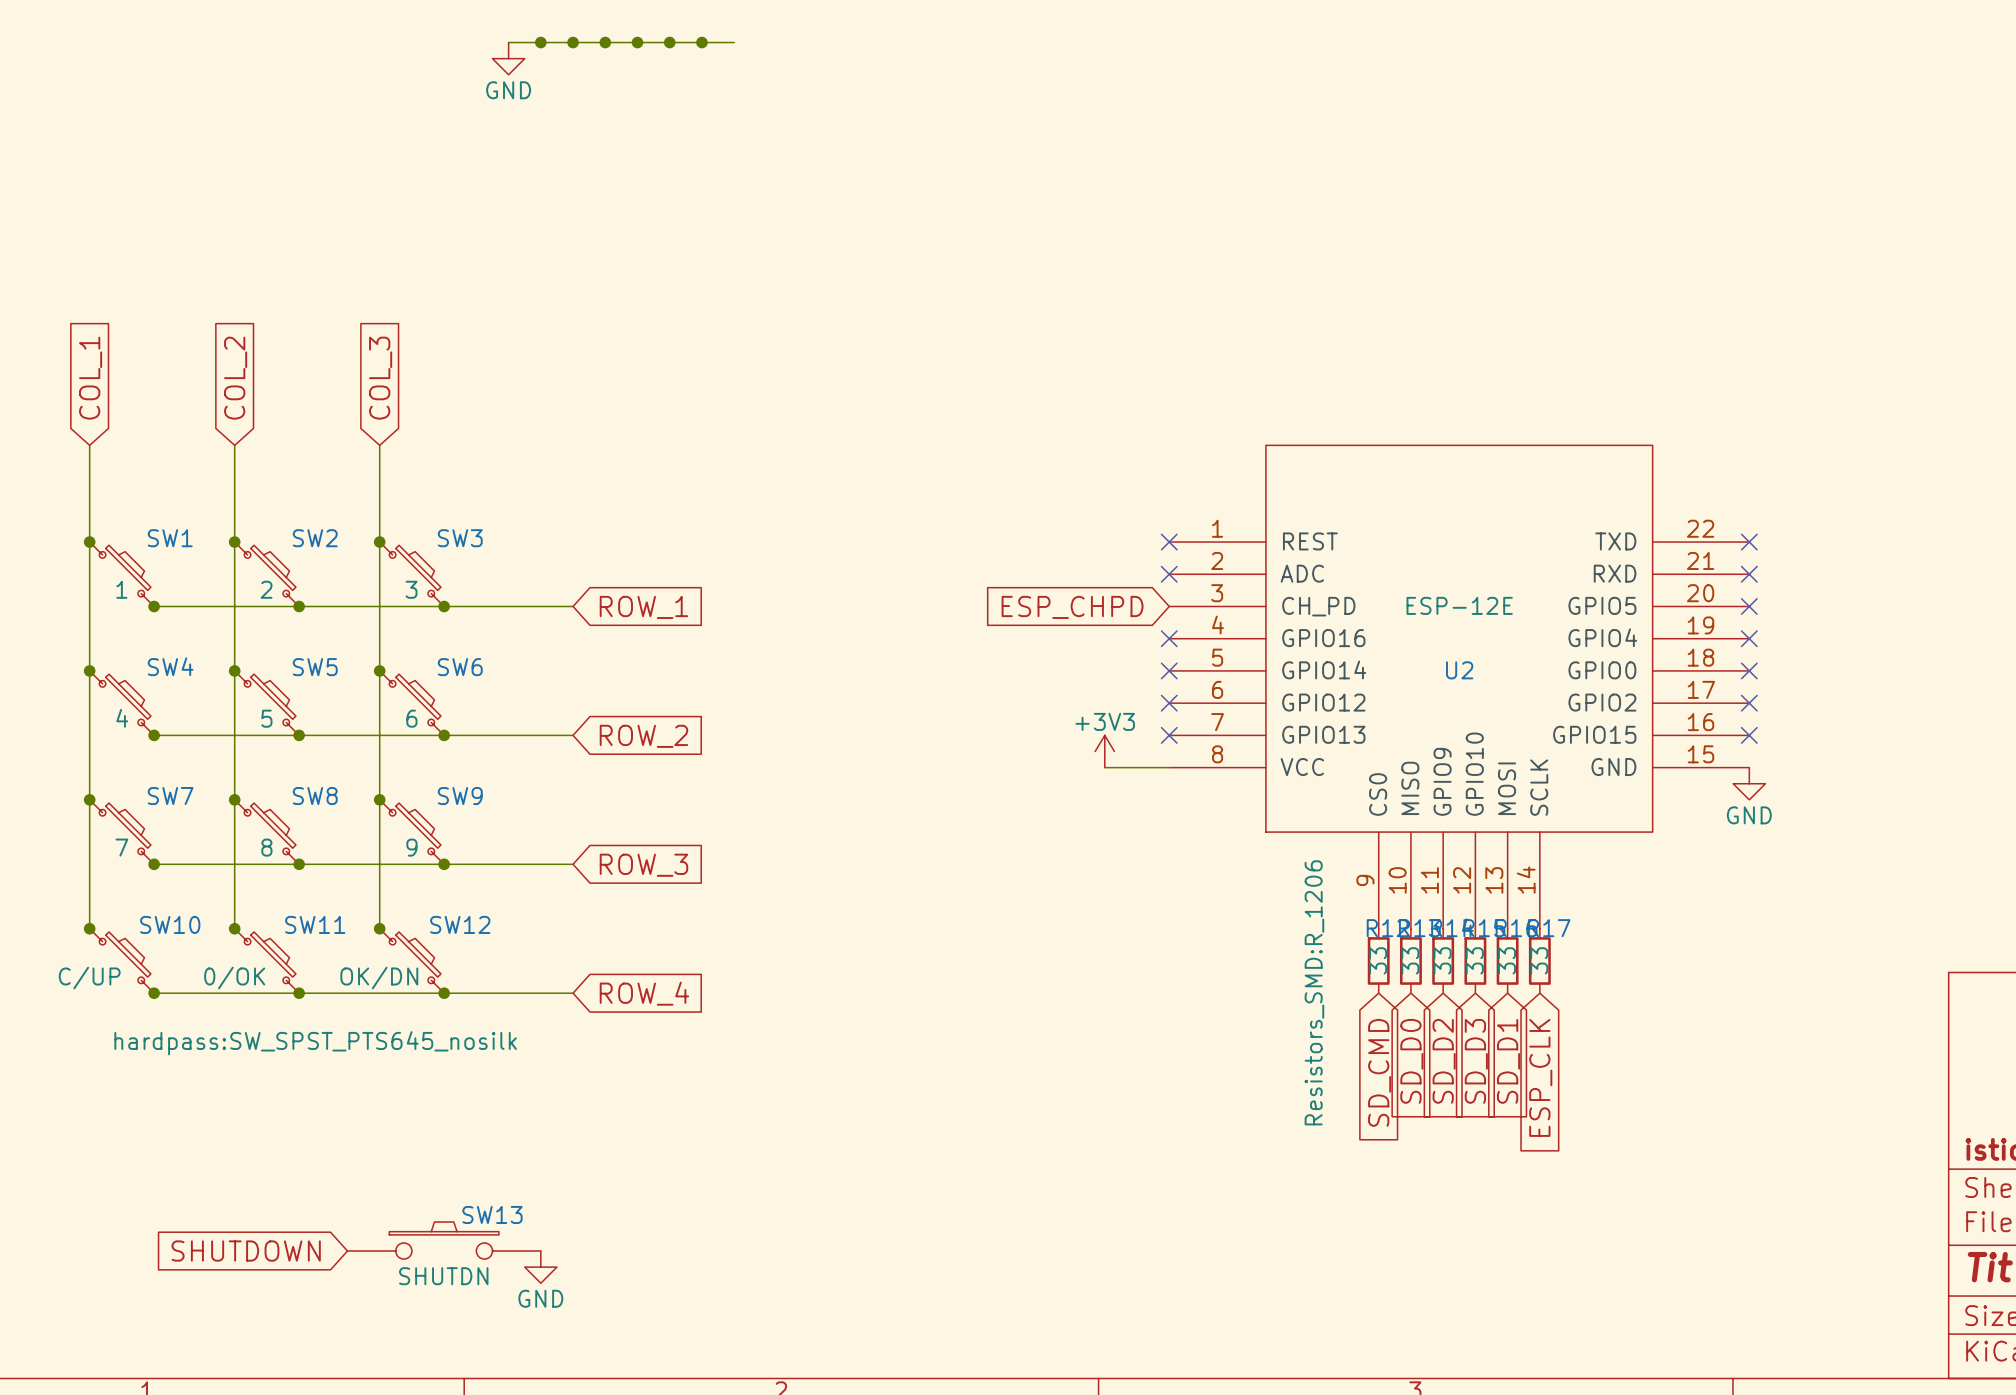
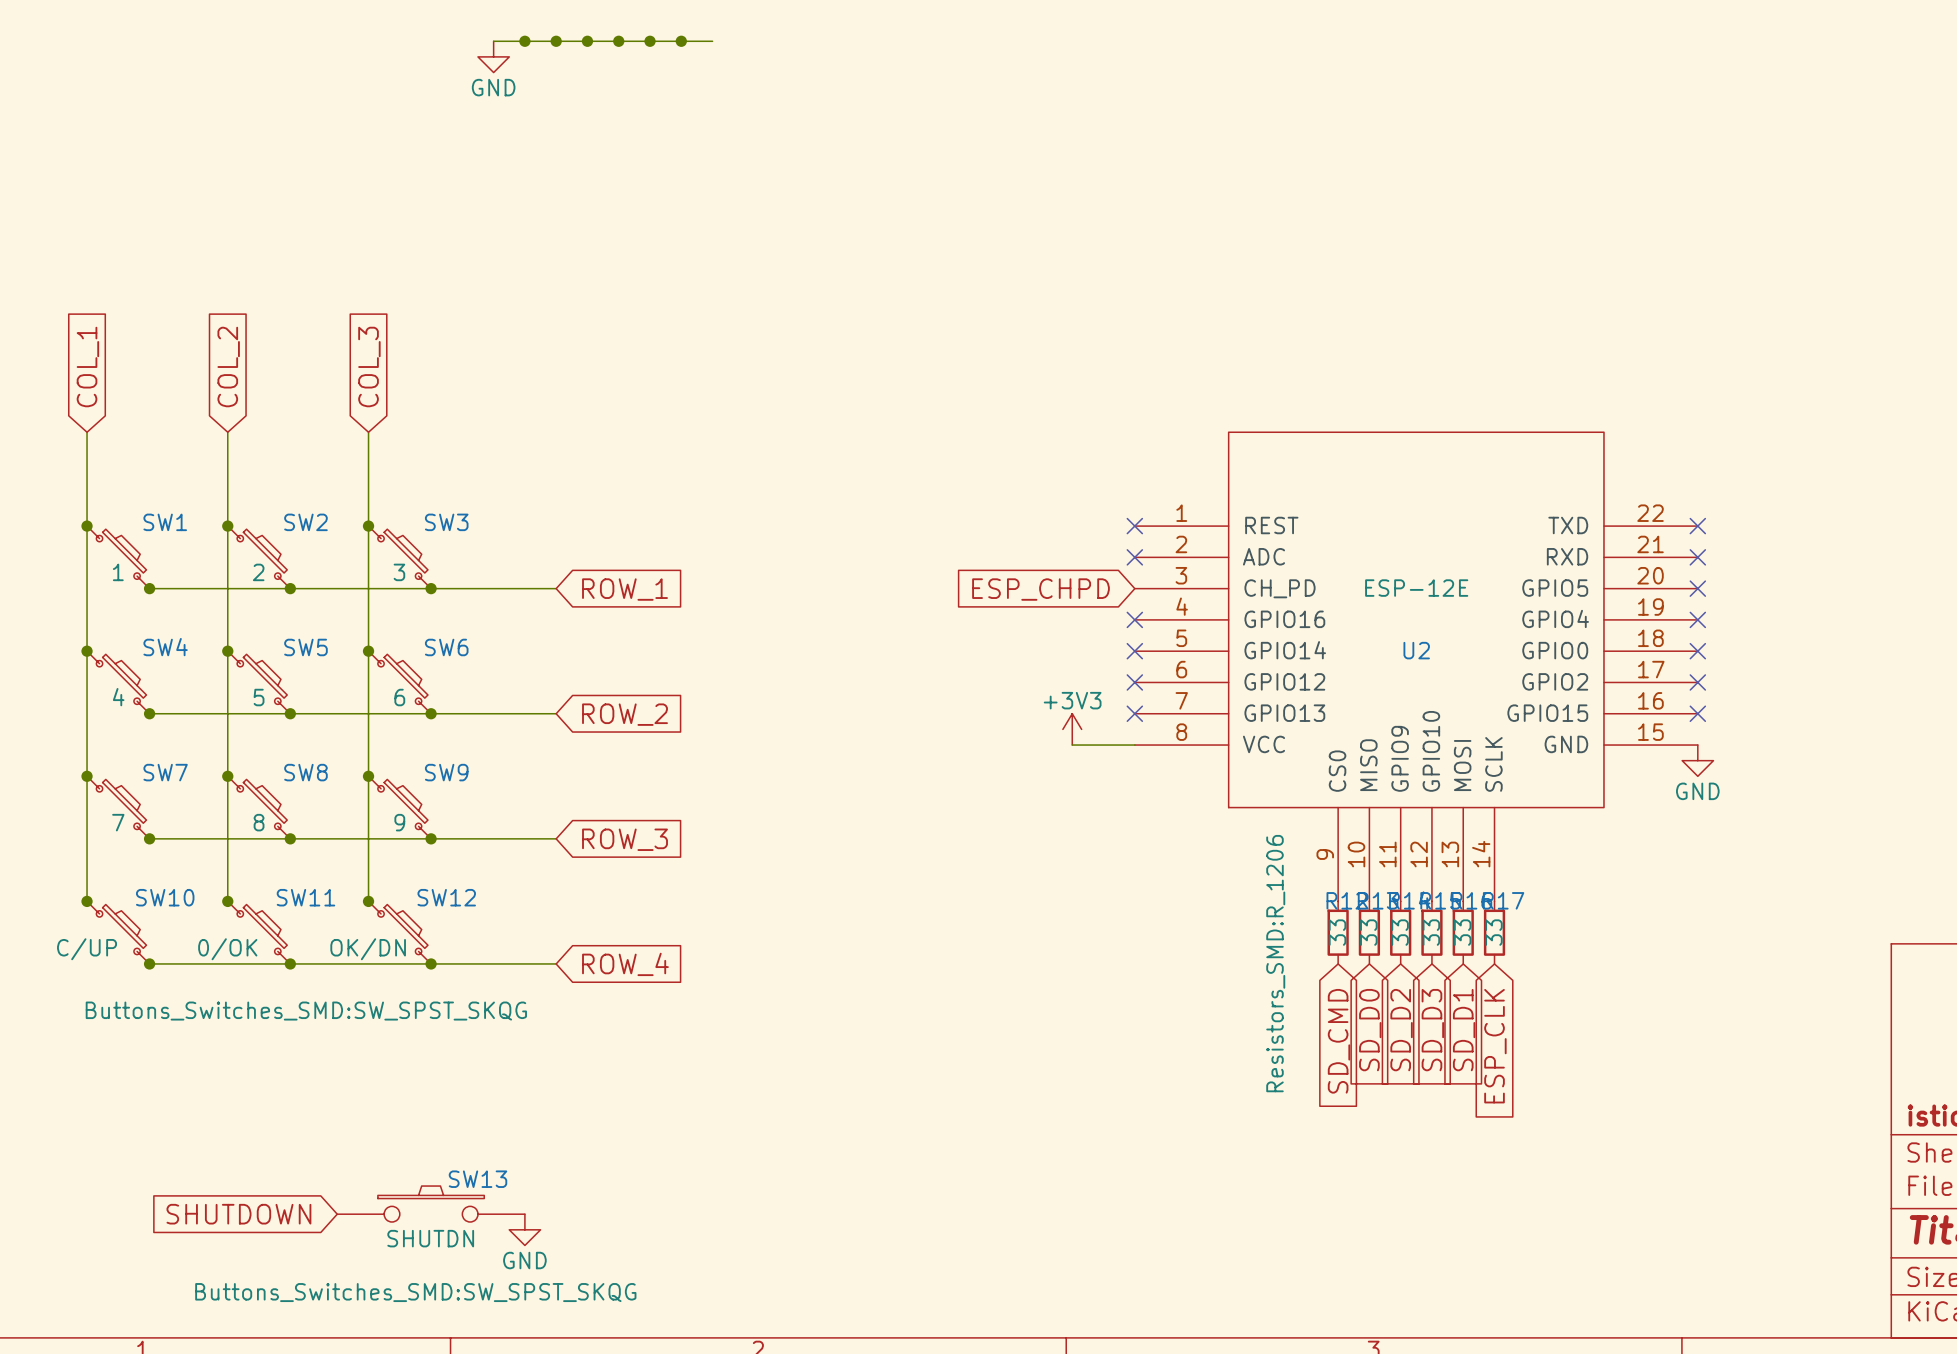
SW1 text: hardpass:SW_SPST_PTS645_nosilk (315, 1043) -> Buttons_Switches_SMD:SW_SPST_SKQG (306, 1011)
SW13 text: none -> Buttons_Switches_SMD:SW_SPST_SKQG (415, 1292)

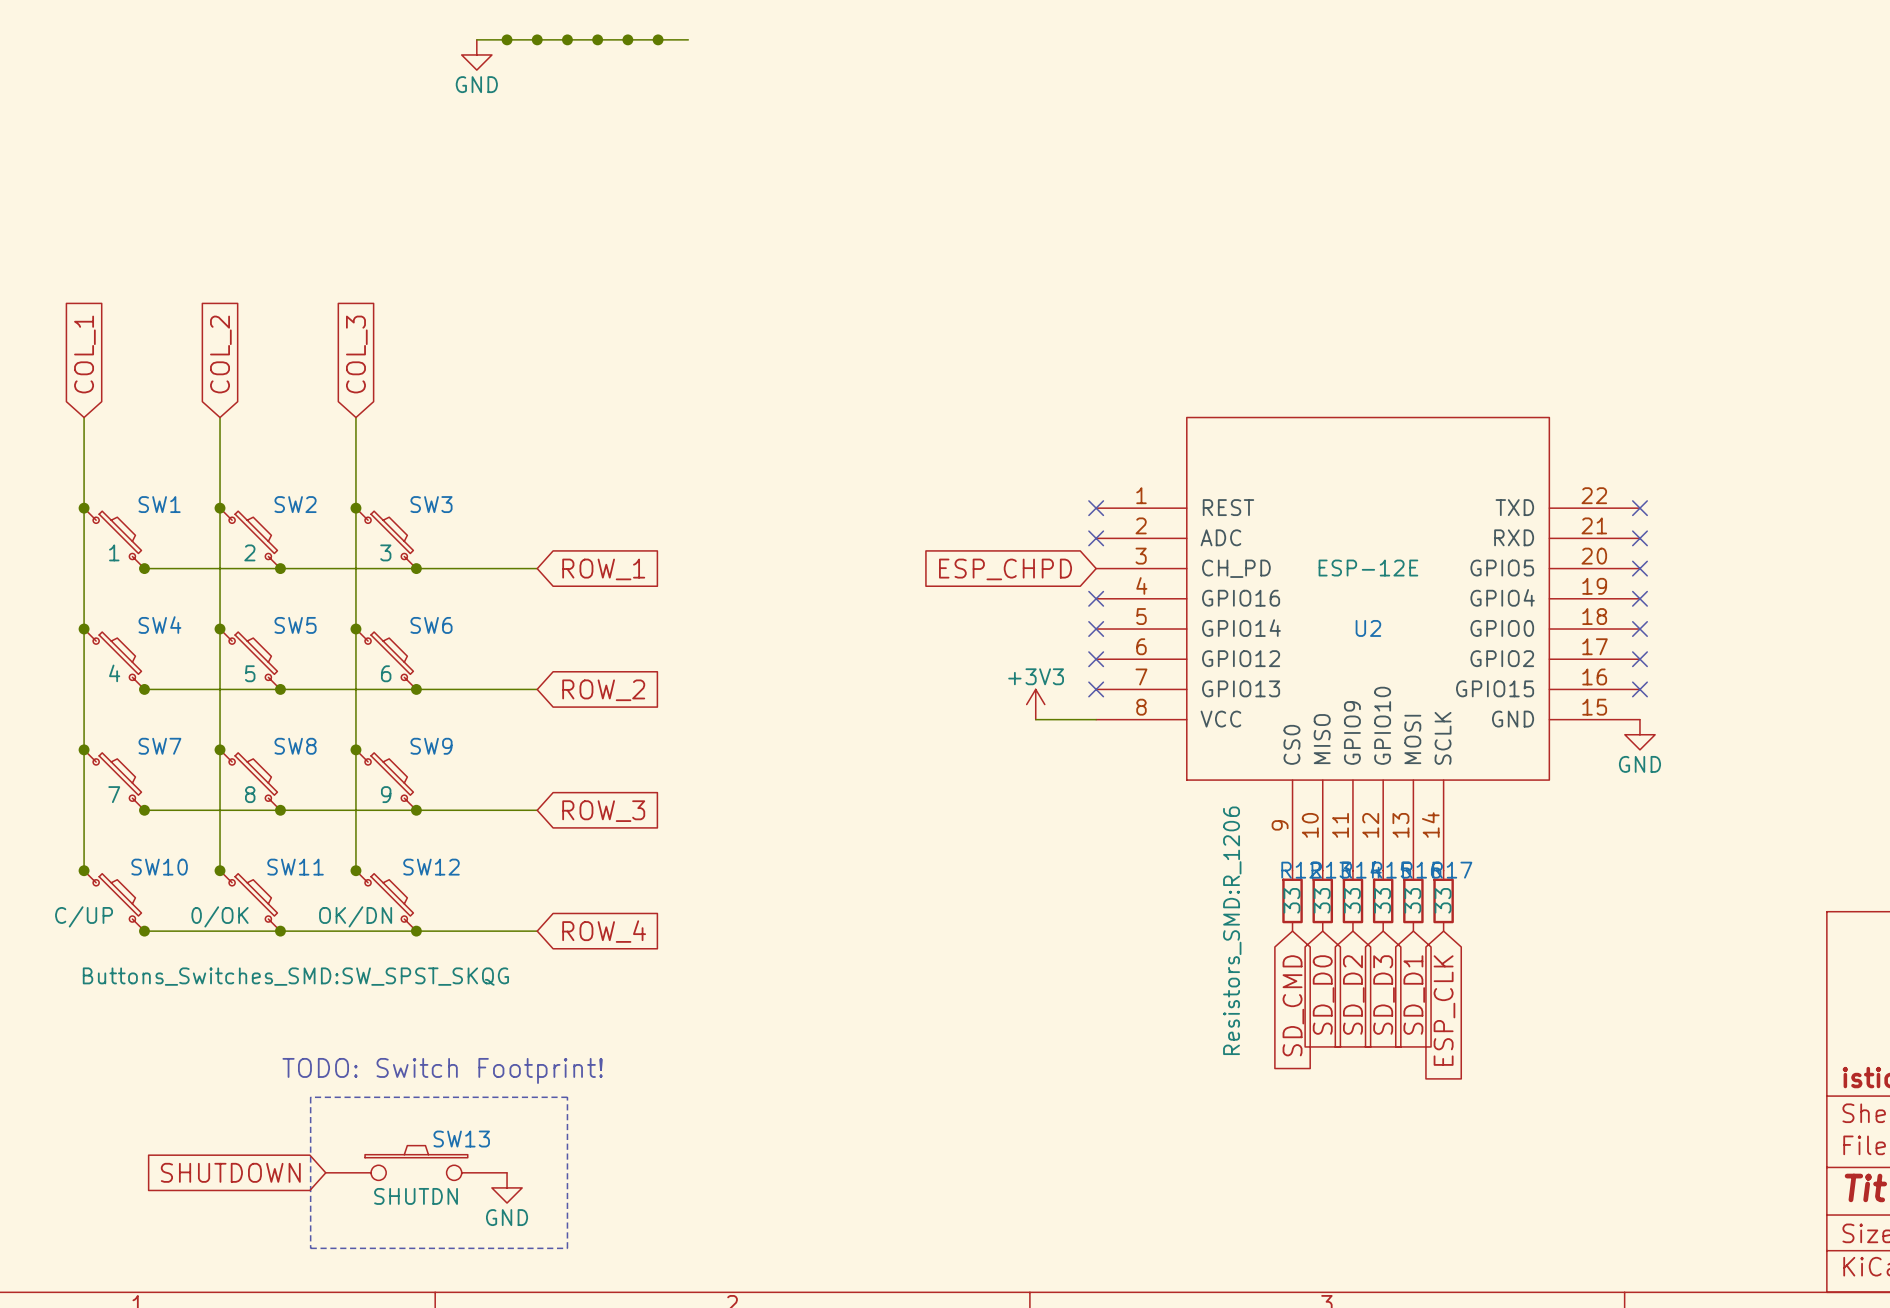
text: none -> TODO: Switch Footprint! (442, 1070)
line: none -> (310, 1097) (310, 1248) (567, 1248) (567, 1097) (310, 1097)
SW13 text: Buttons_Switches_SMD:SW_SPST_SKQG (415, 1292) -> none

